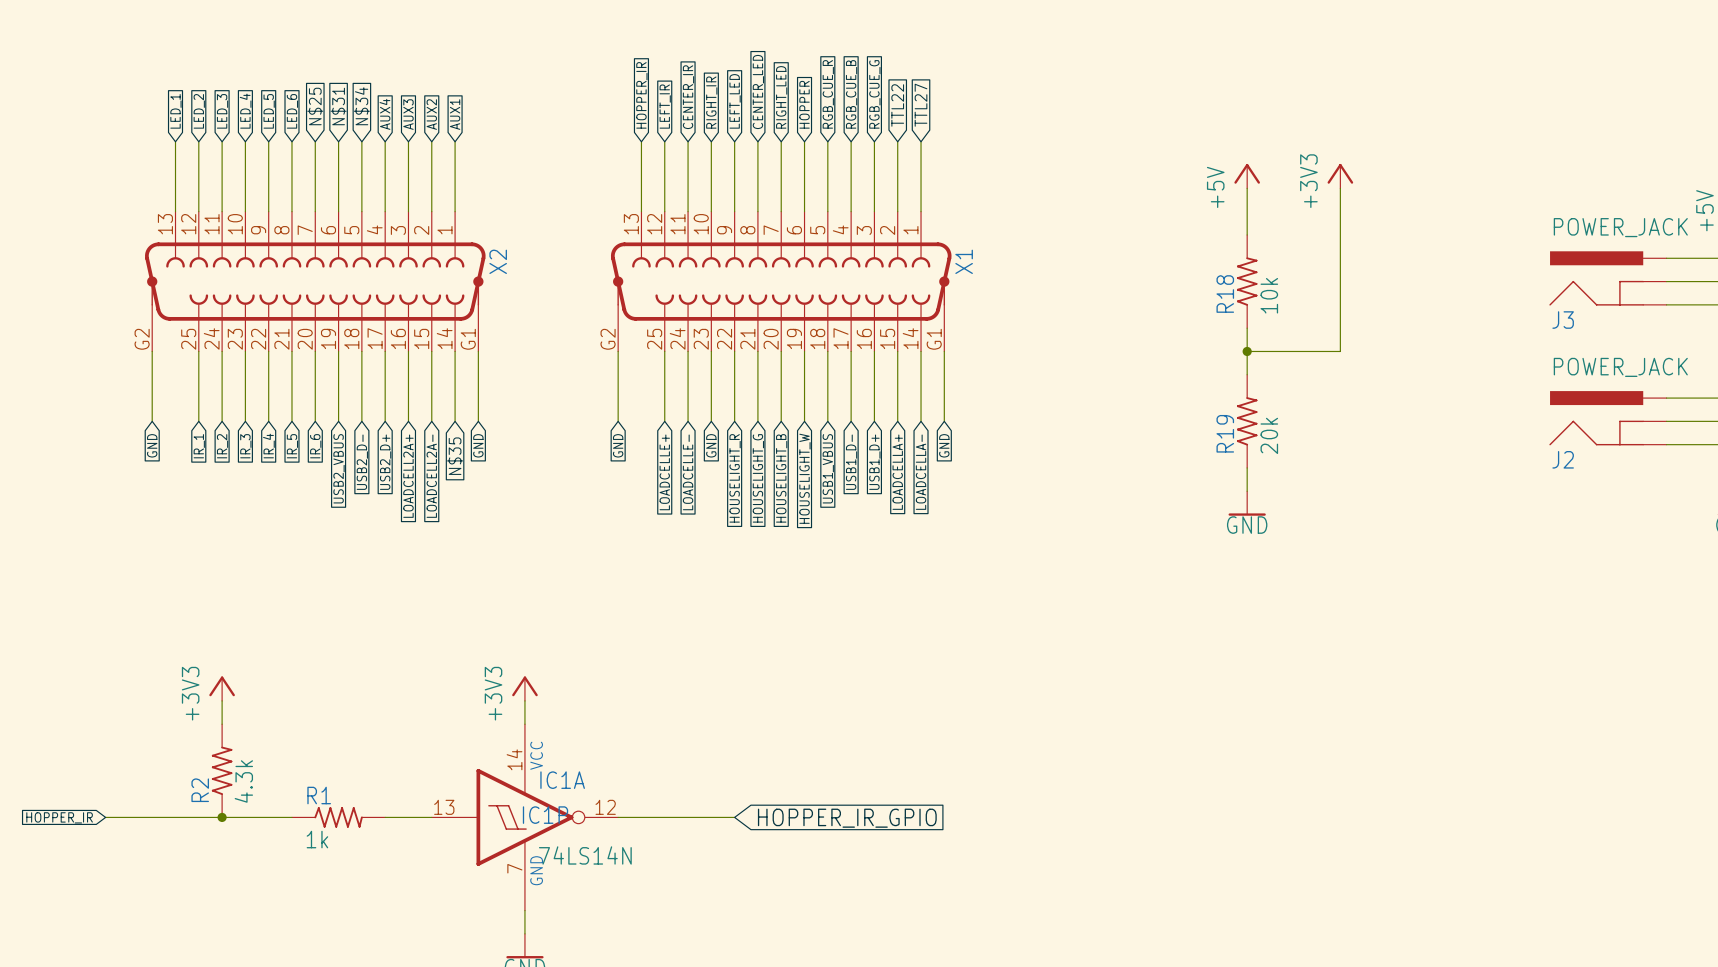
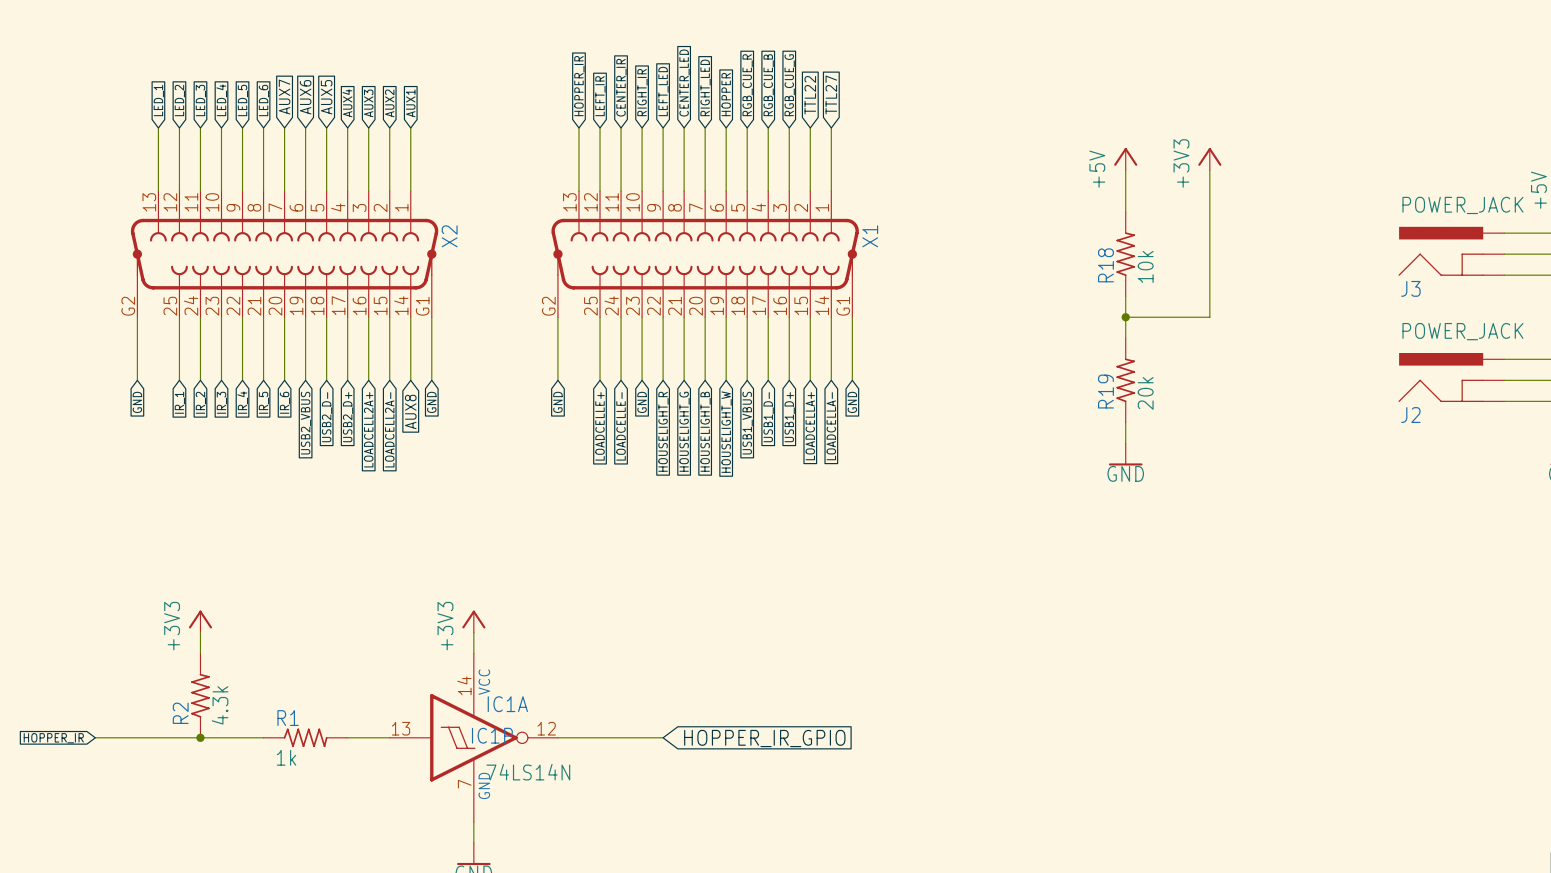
global label: N$25 (315, 106) -> AUX7 (284, 97)
global label: N$31 (338, 106) -> AUX6 (305, 97)
global label: N$34 (361, 106) -> AUX5 (326, 97)
global label: N$35 (455, 456) -> AUX8 (410, 411)

